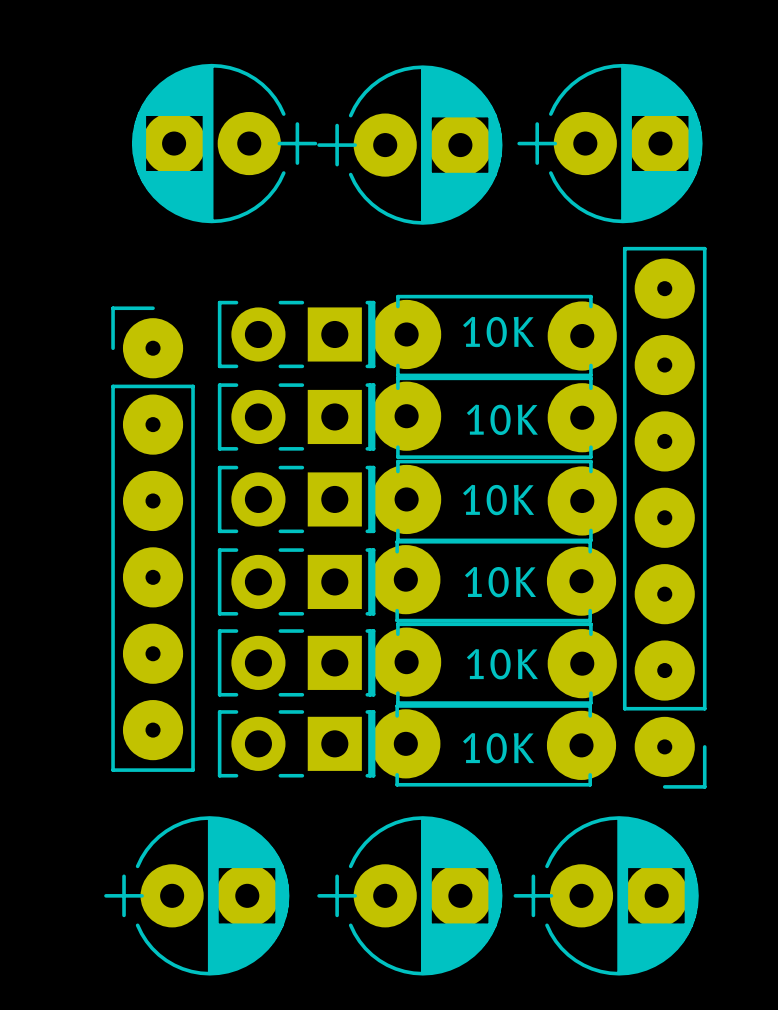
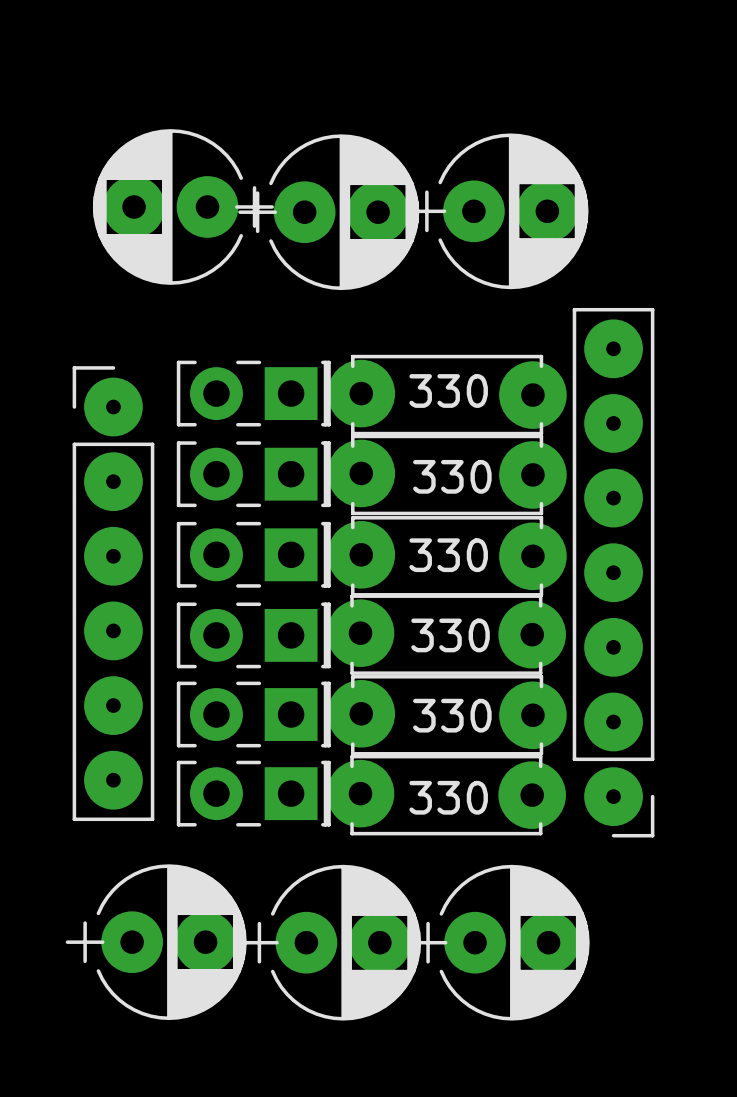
part position: (609, 143) -> (498, 211)
part position: (409, 145) -> (328, 212)
10K name: 10K (498, 332) -> 330 (448, 390)
10K name: 10K (502, 419) -> 330 (452, 476)
10K name: 10K (498, 500) -> 330 (448, 555)
10K name: 10K (500, 582) -> 330 (450, 635)
10K name: 10K (502, 664) -> 330 (452, 715)
10K name: 10K (498, 748) -> 330 (448, 797)
part position: (409, 895) -> (330, 942)
part position: (606, 895) -> (499, 942)

